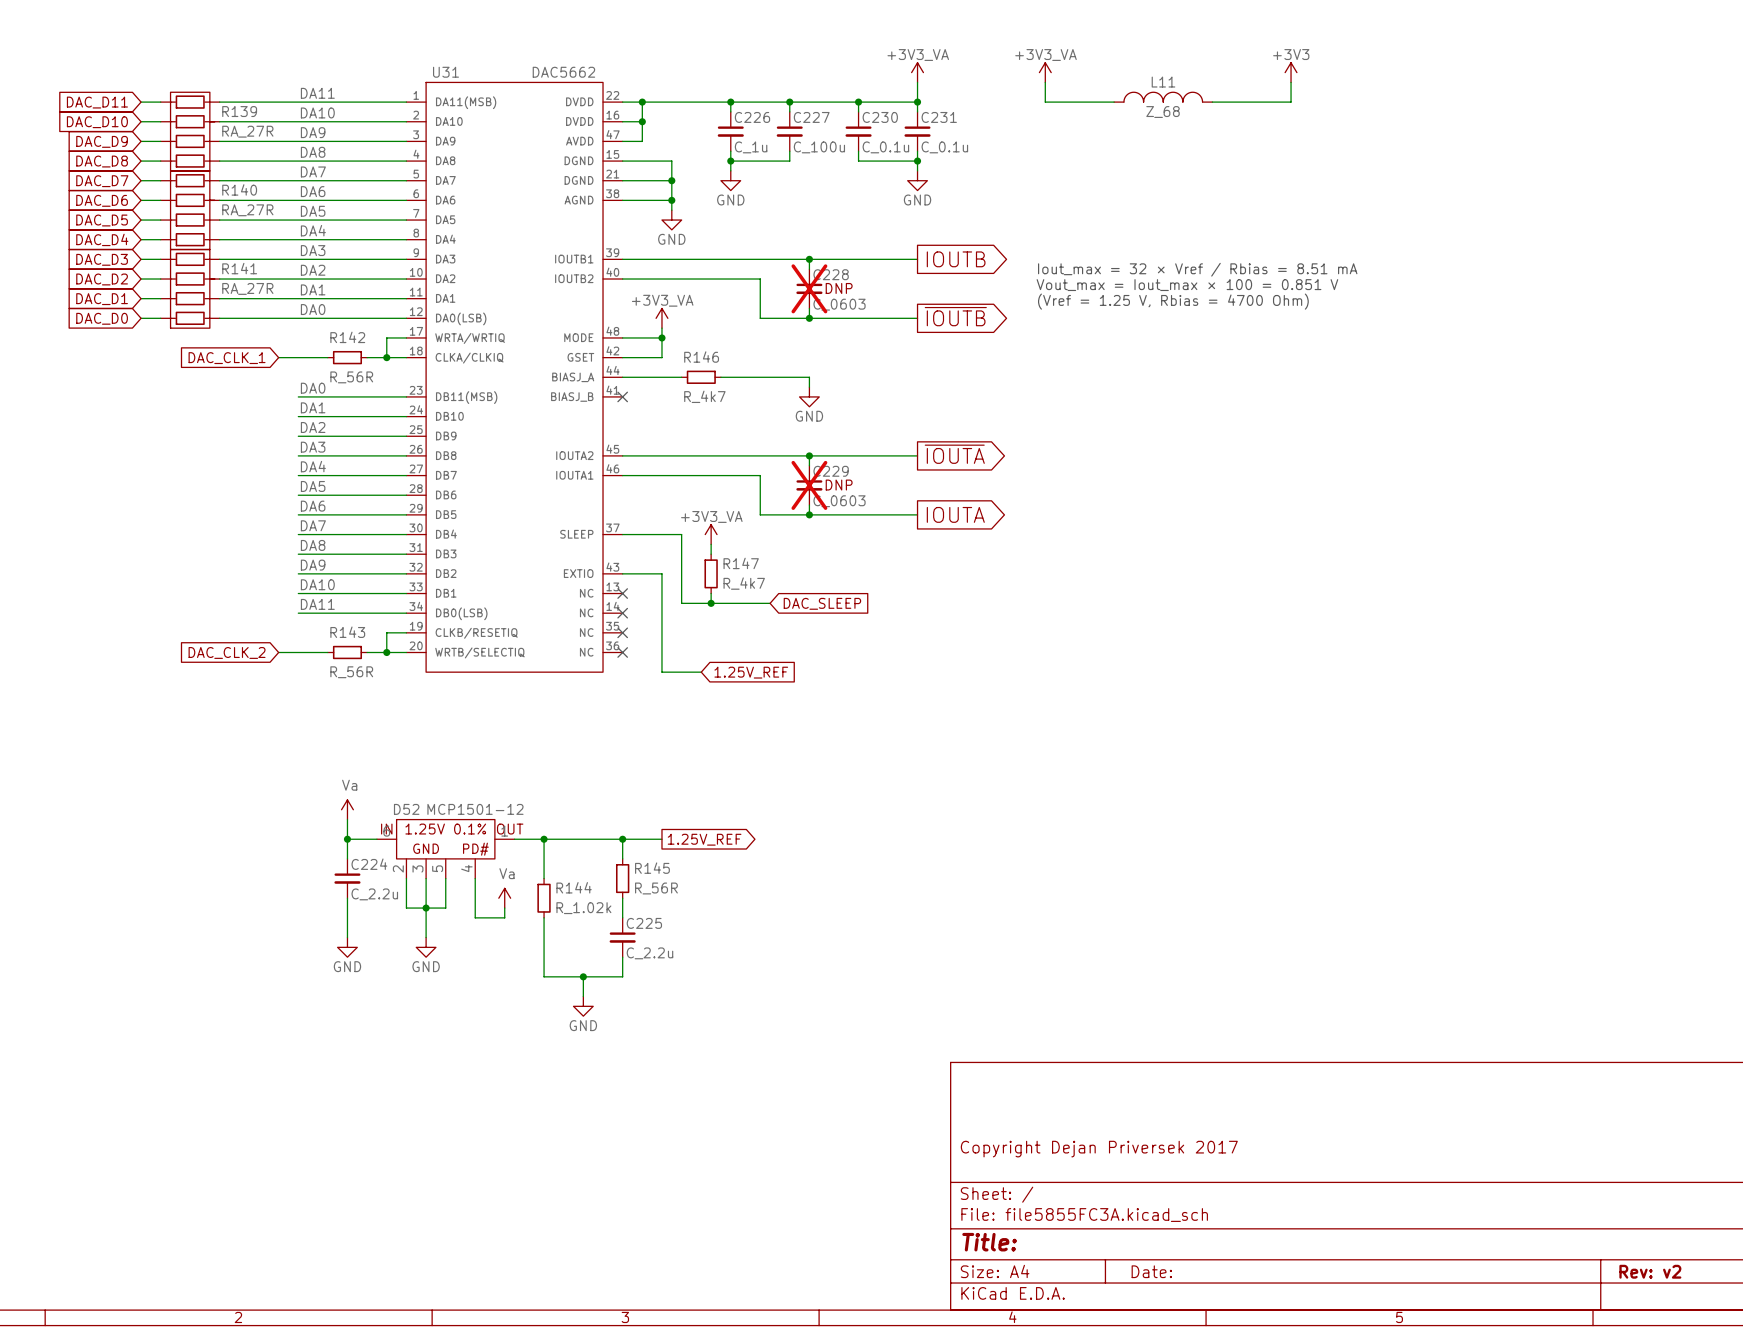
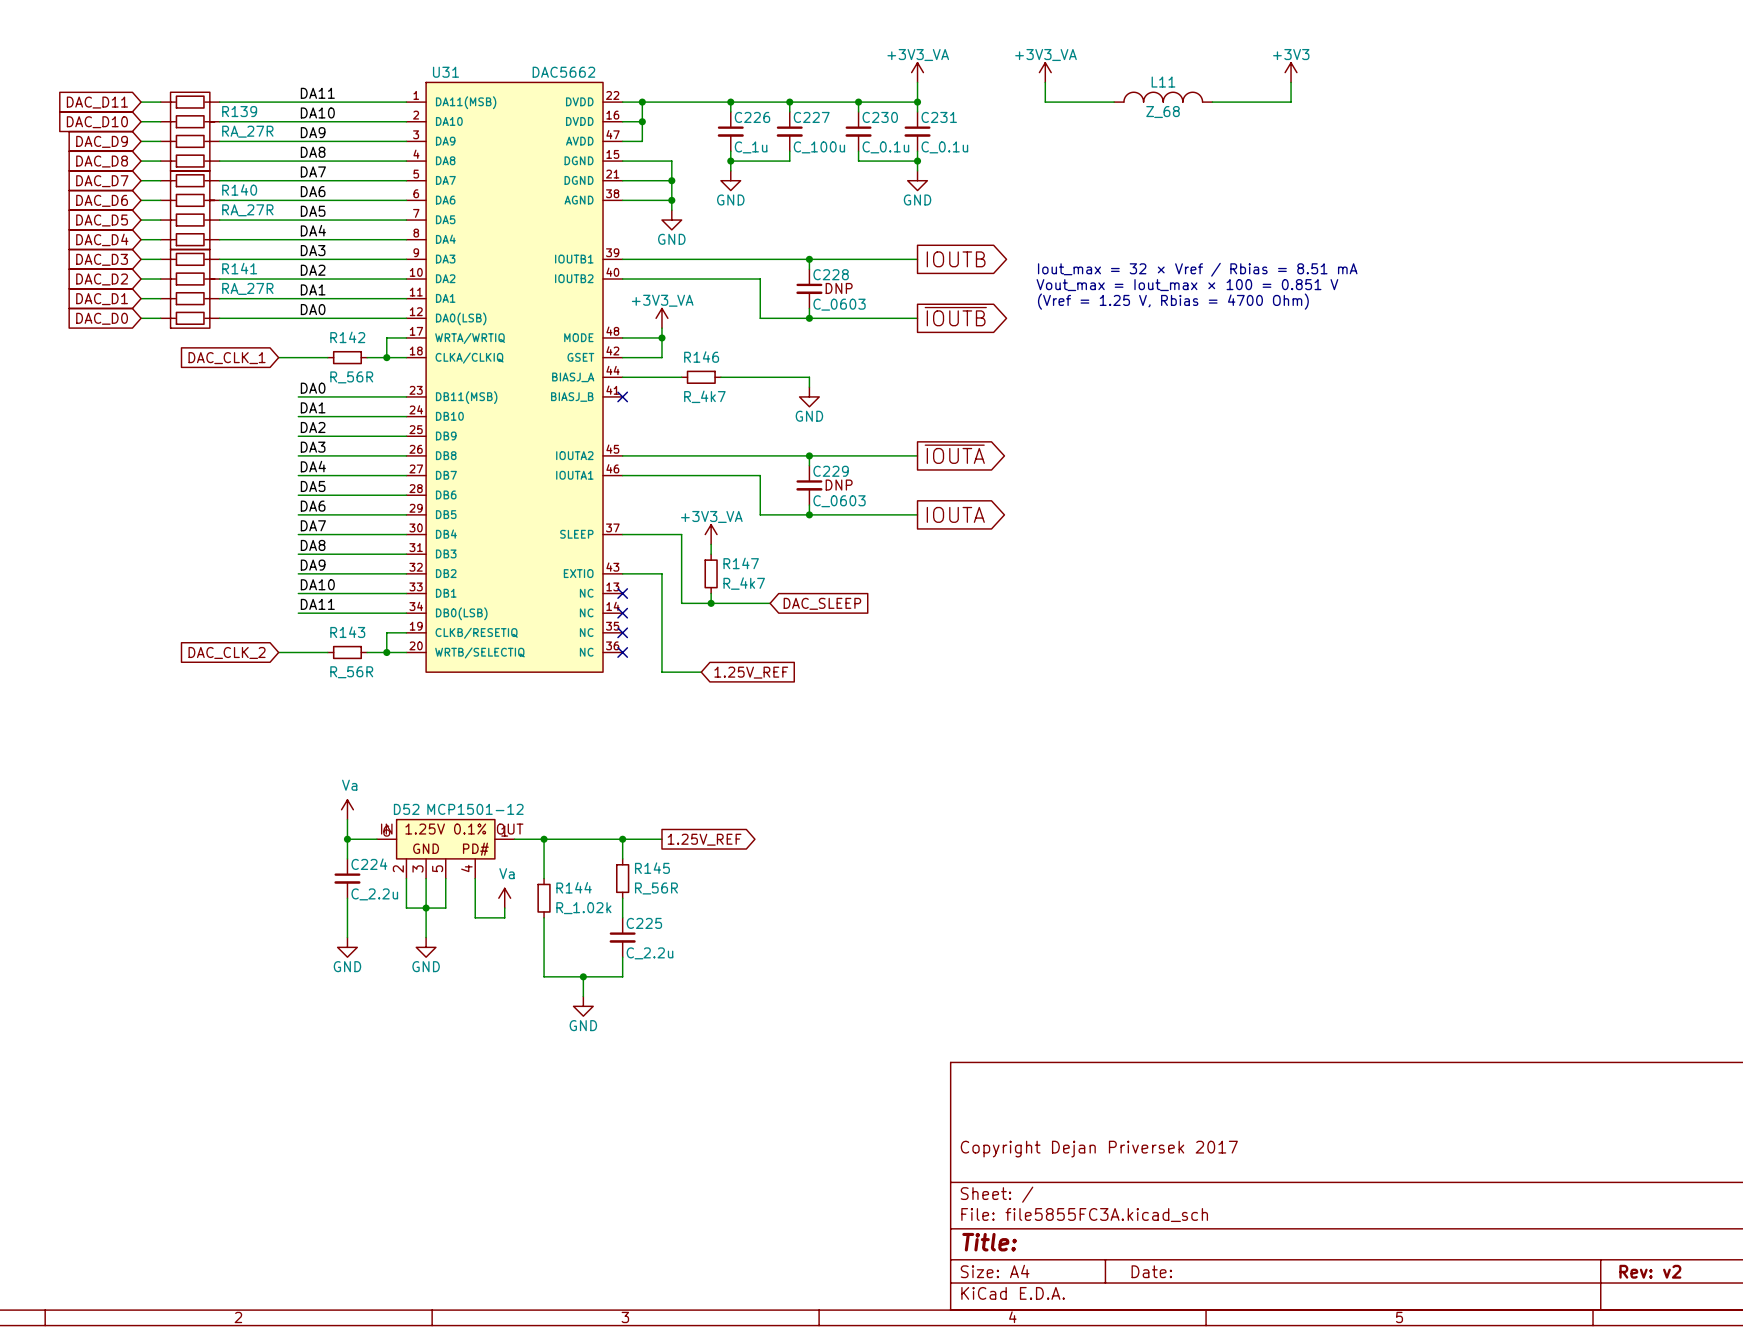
C228 do-not-place cross: (809, 288) -> none
C229 do-not-place cross: (809, 485) -> none

